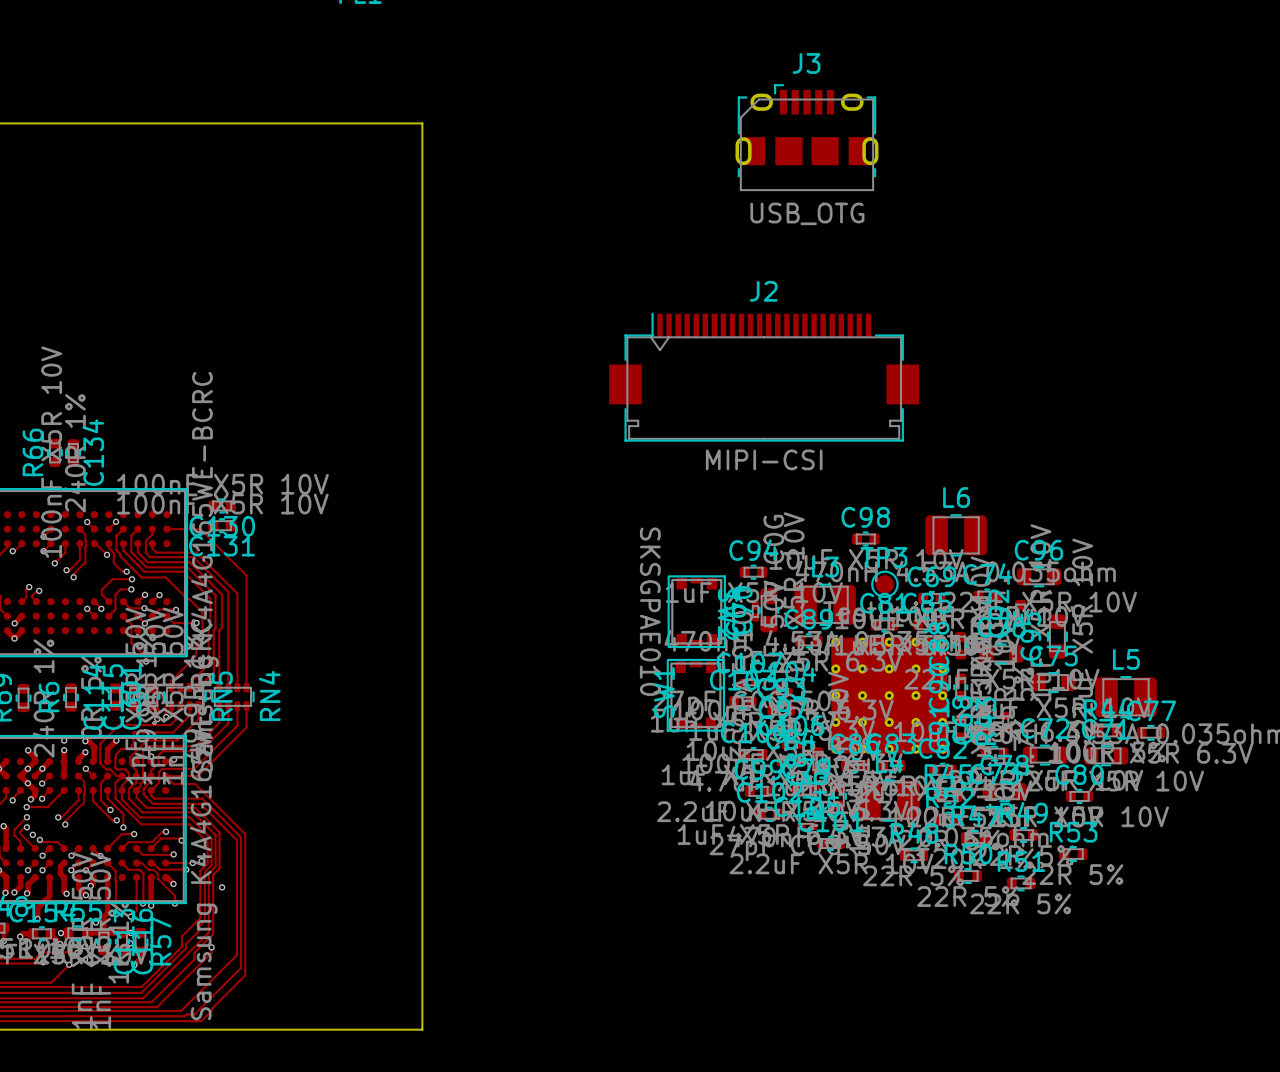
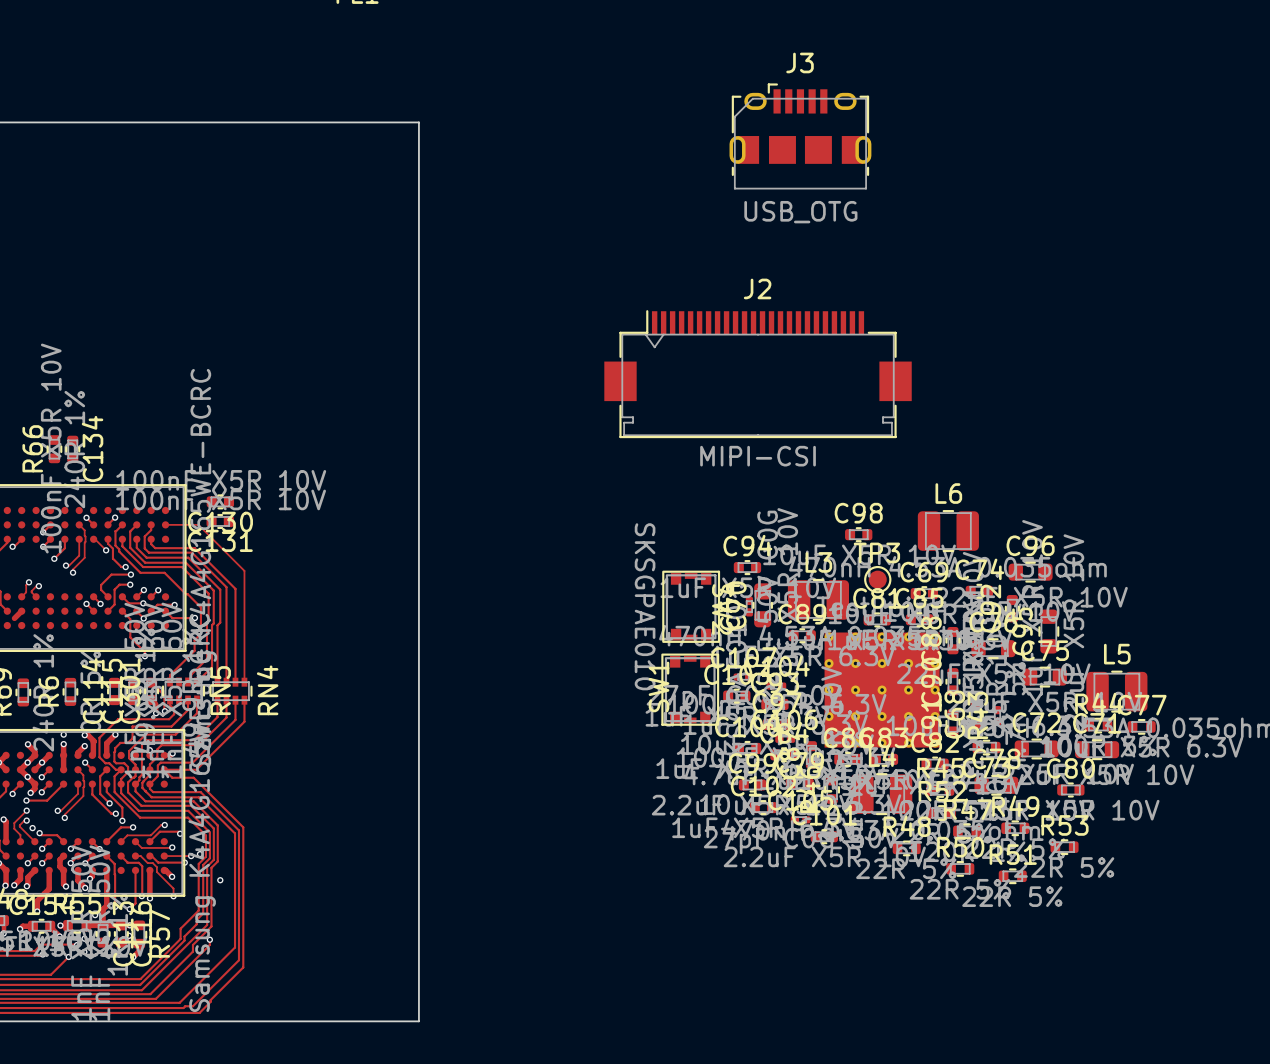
via: (14, 623) -> none
track: (7, 630) (14, 638) (21, 630) -> none
via: (14, 638) -> none

